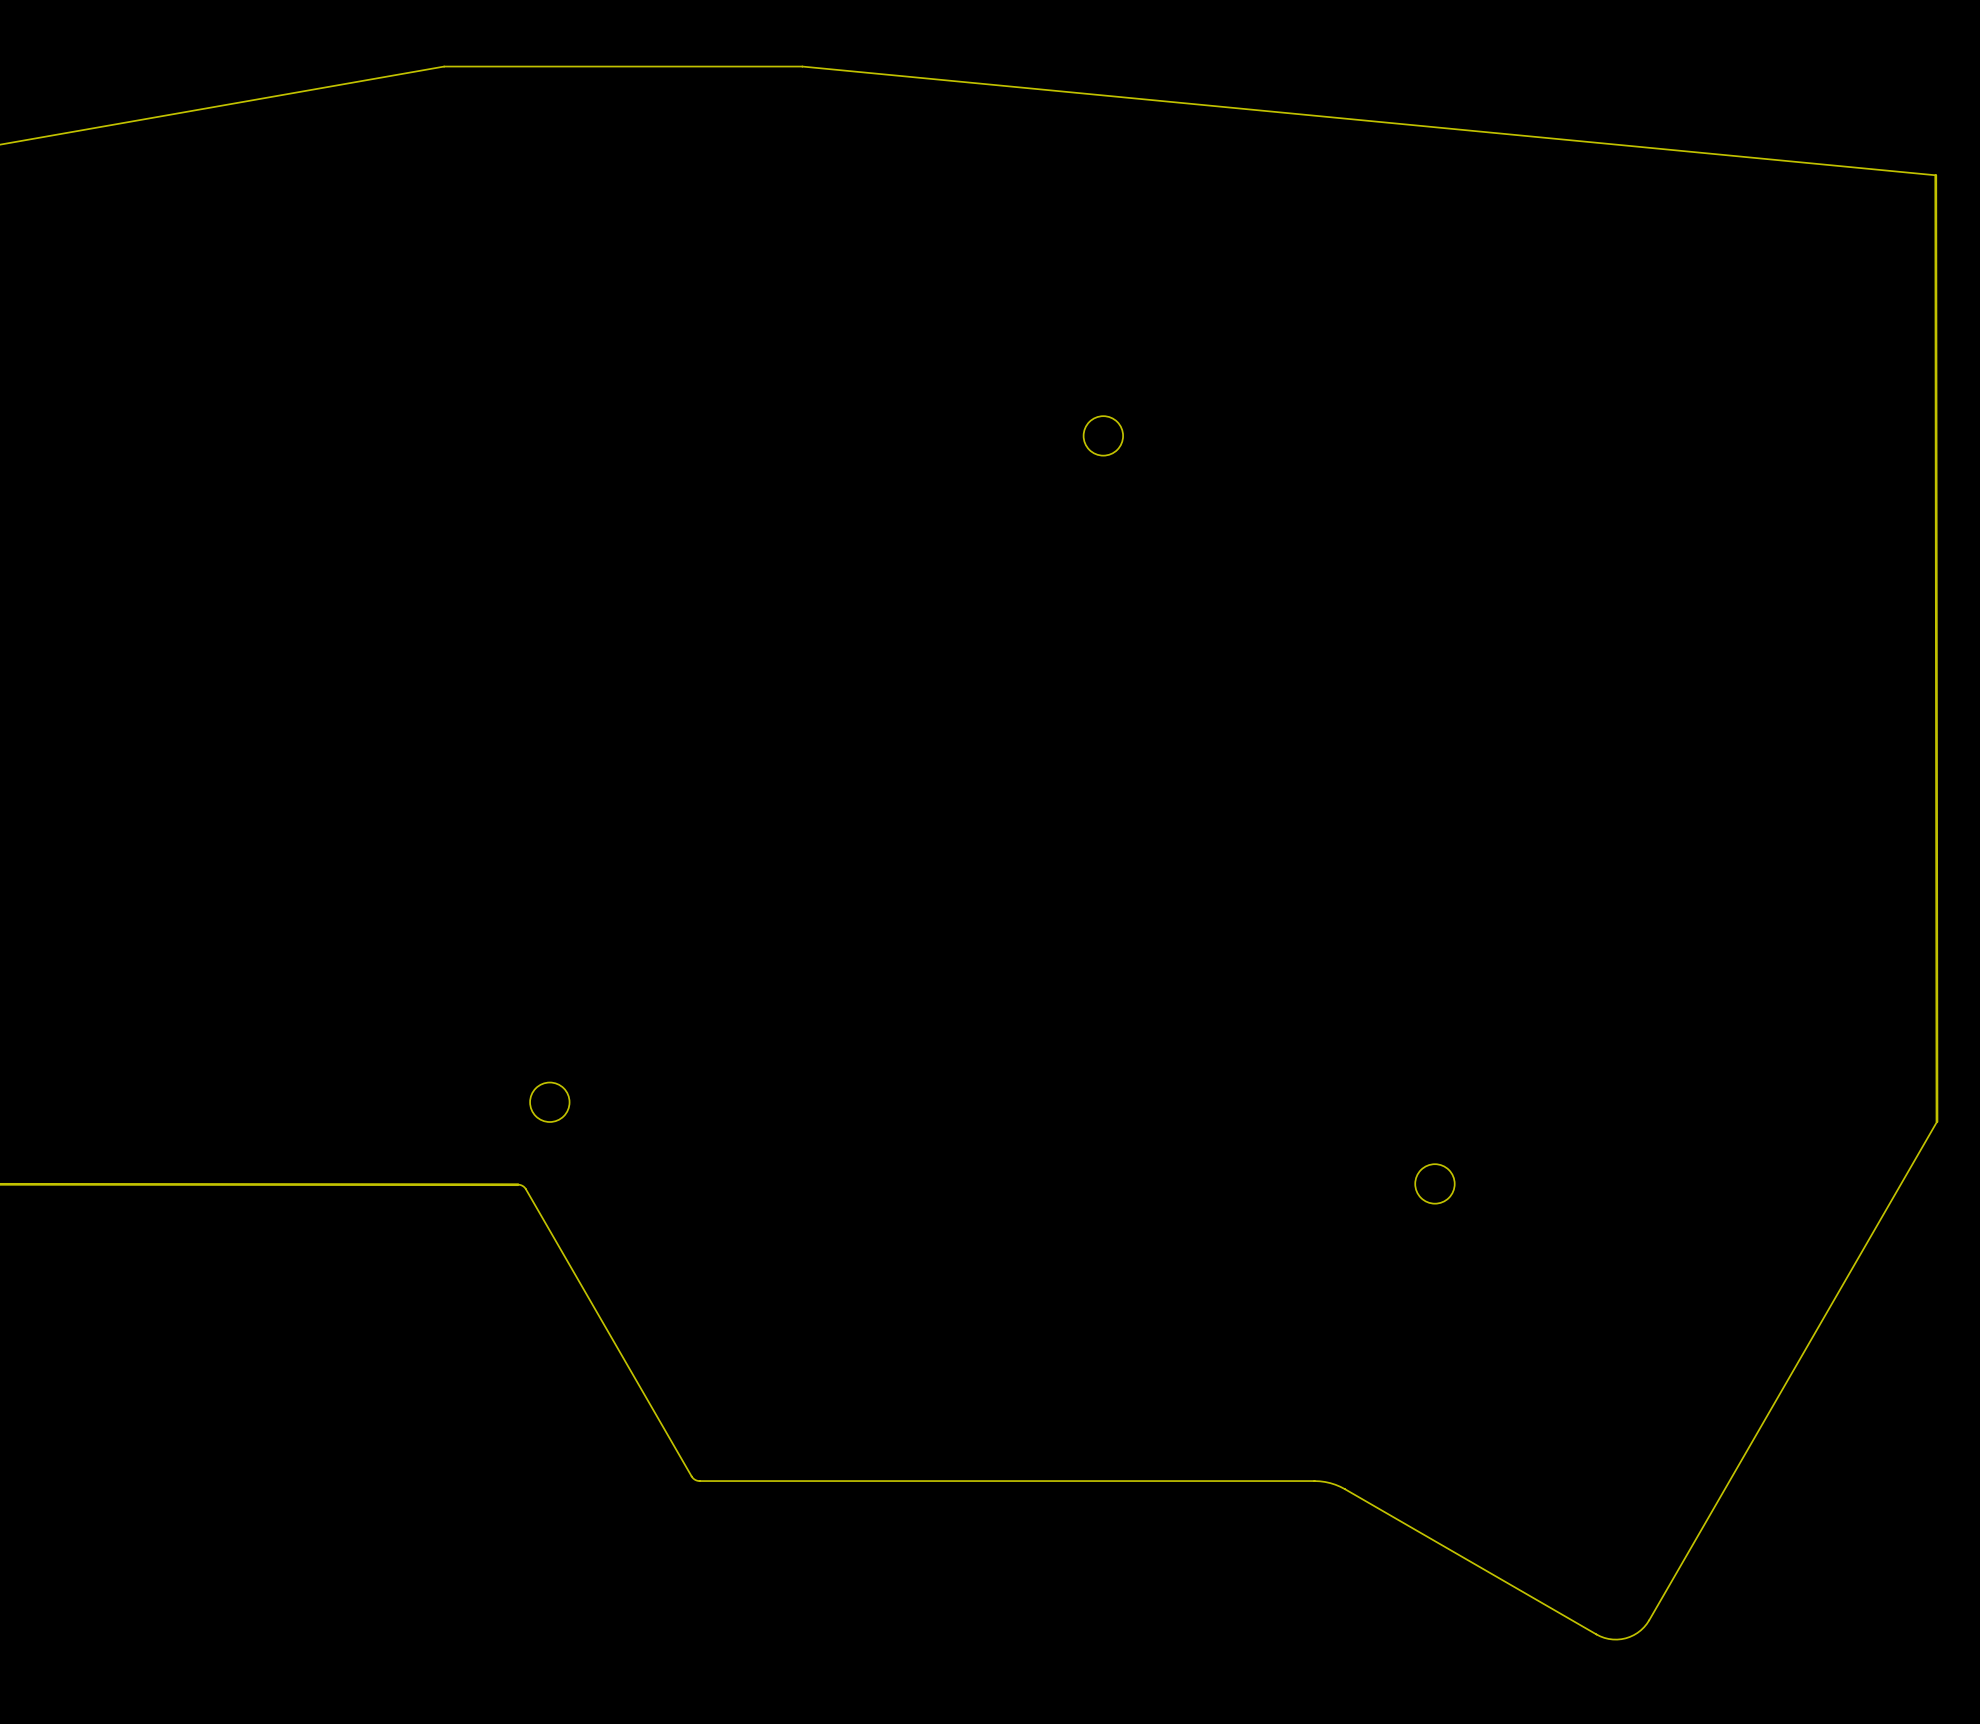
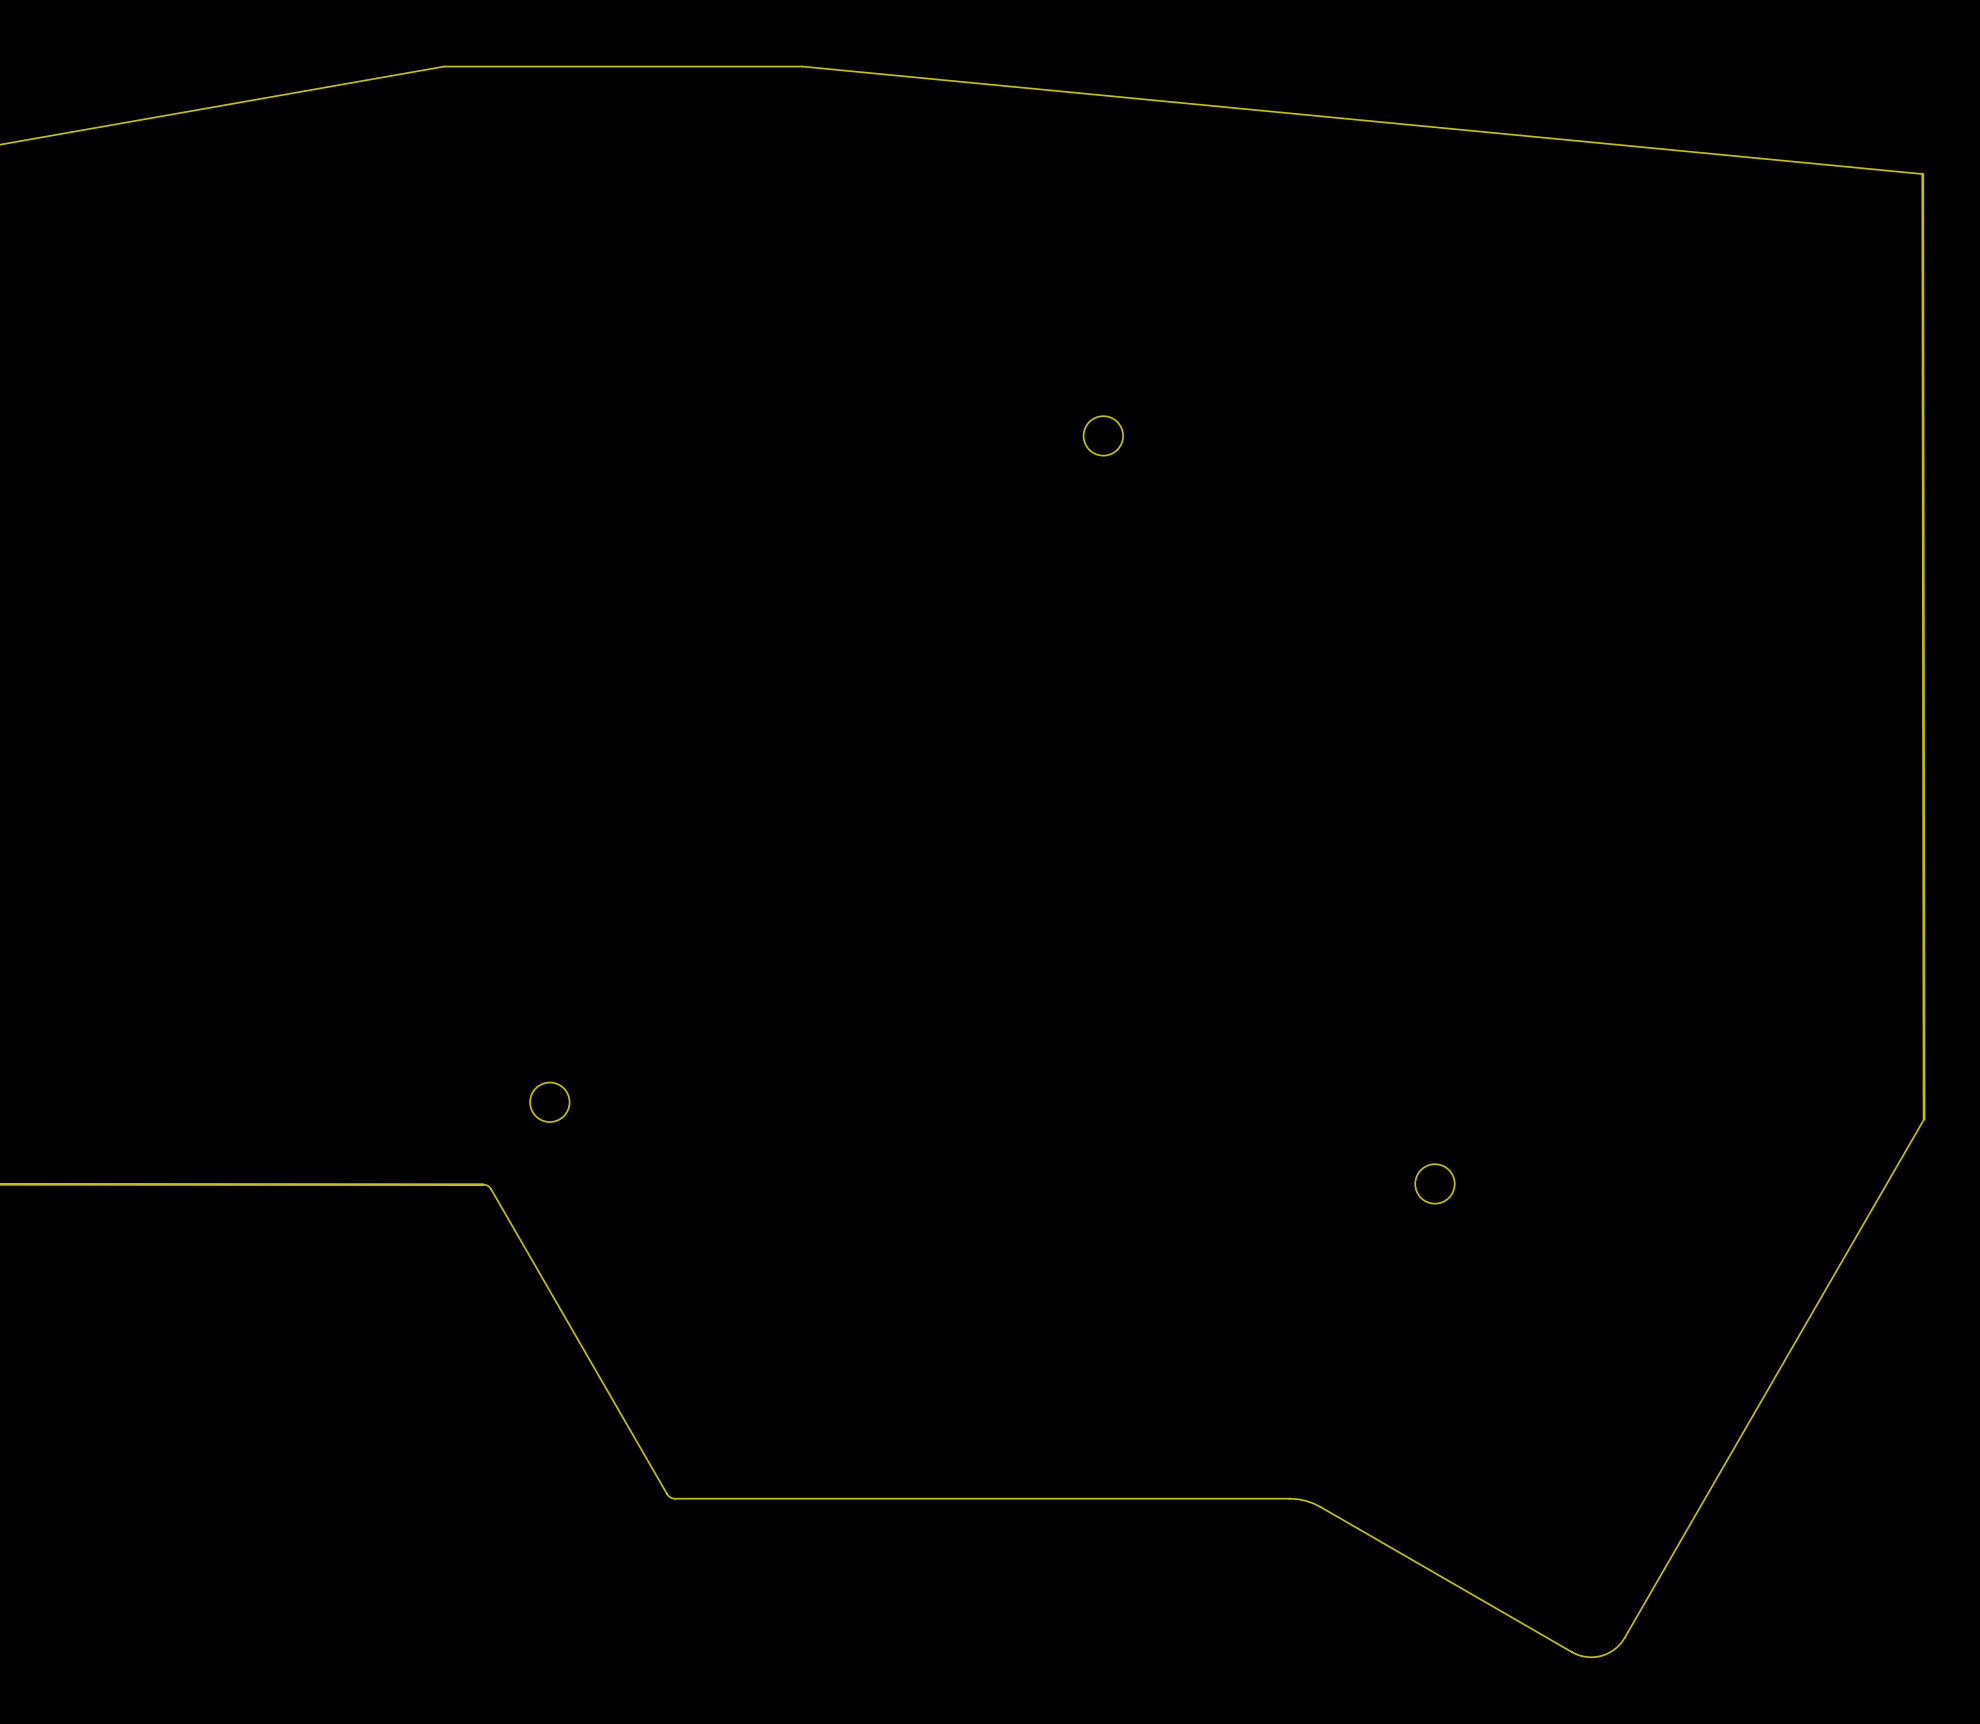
board edge: (1922, 174) (1935, 175) (1936, 1121) (1649, 1620) (1637, 1632) (1621, 1639) (1600, 1636) (1345, 1489) (1325, 1481) (695, 1480) (691, 1476) (525, 1188) (519, 1184) (483, 1184) -> (1922, 174) (1924, 1119) (1624, 1637) (1612, 1650) (1592, 1657) (1575, 1654) (1320, 1506) (1297, 1499) (671, 1497) (667, 1494) (491, 1189) (483, 1184)

